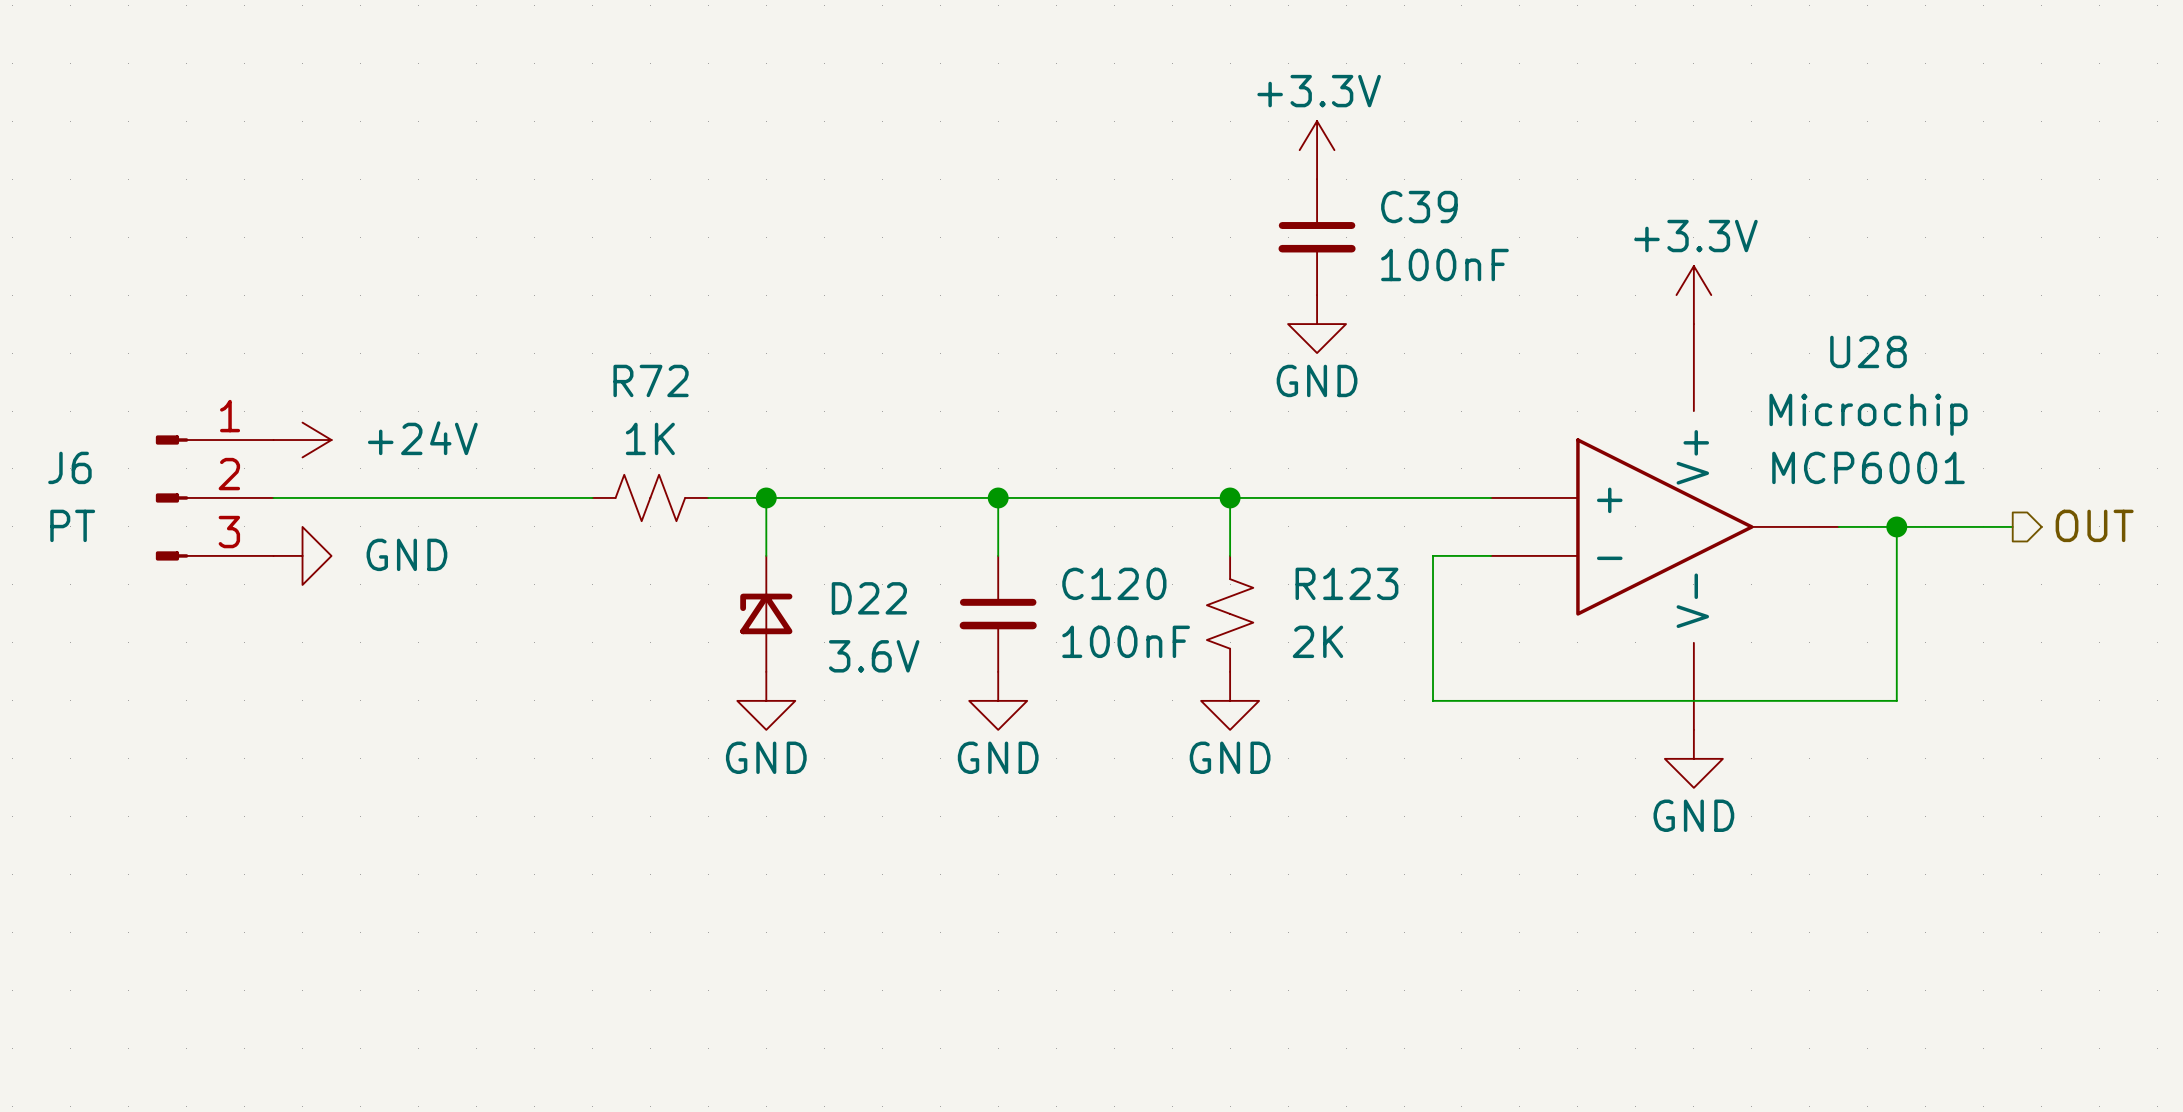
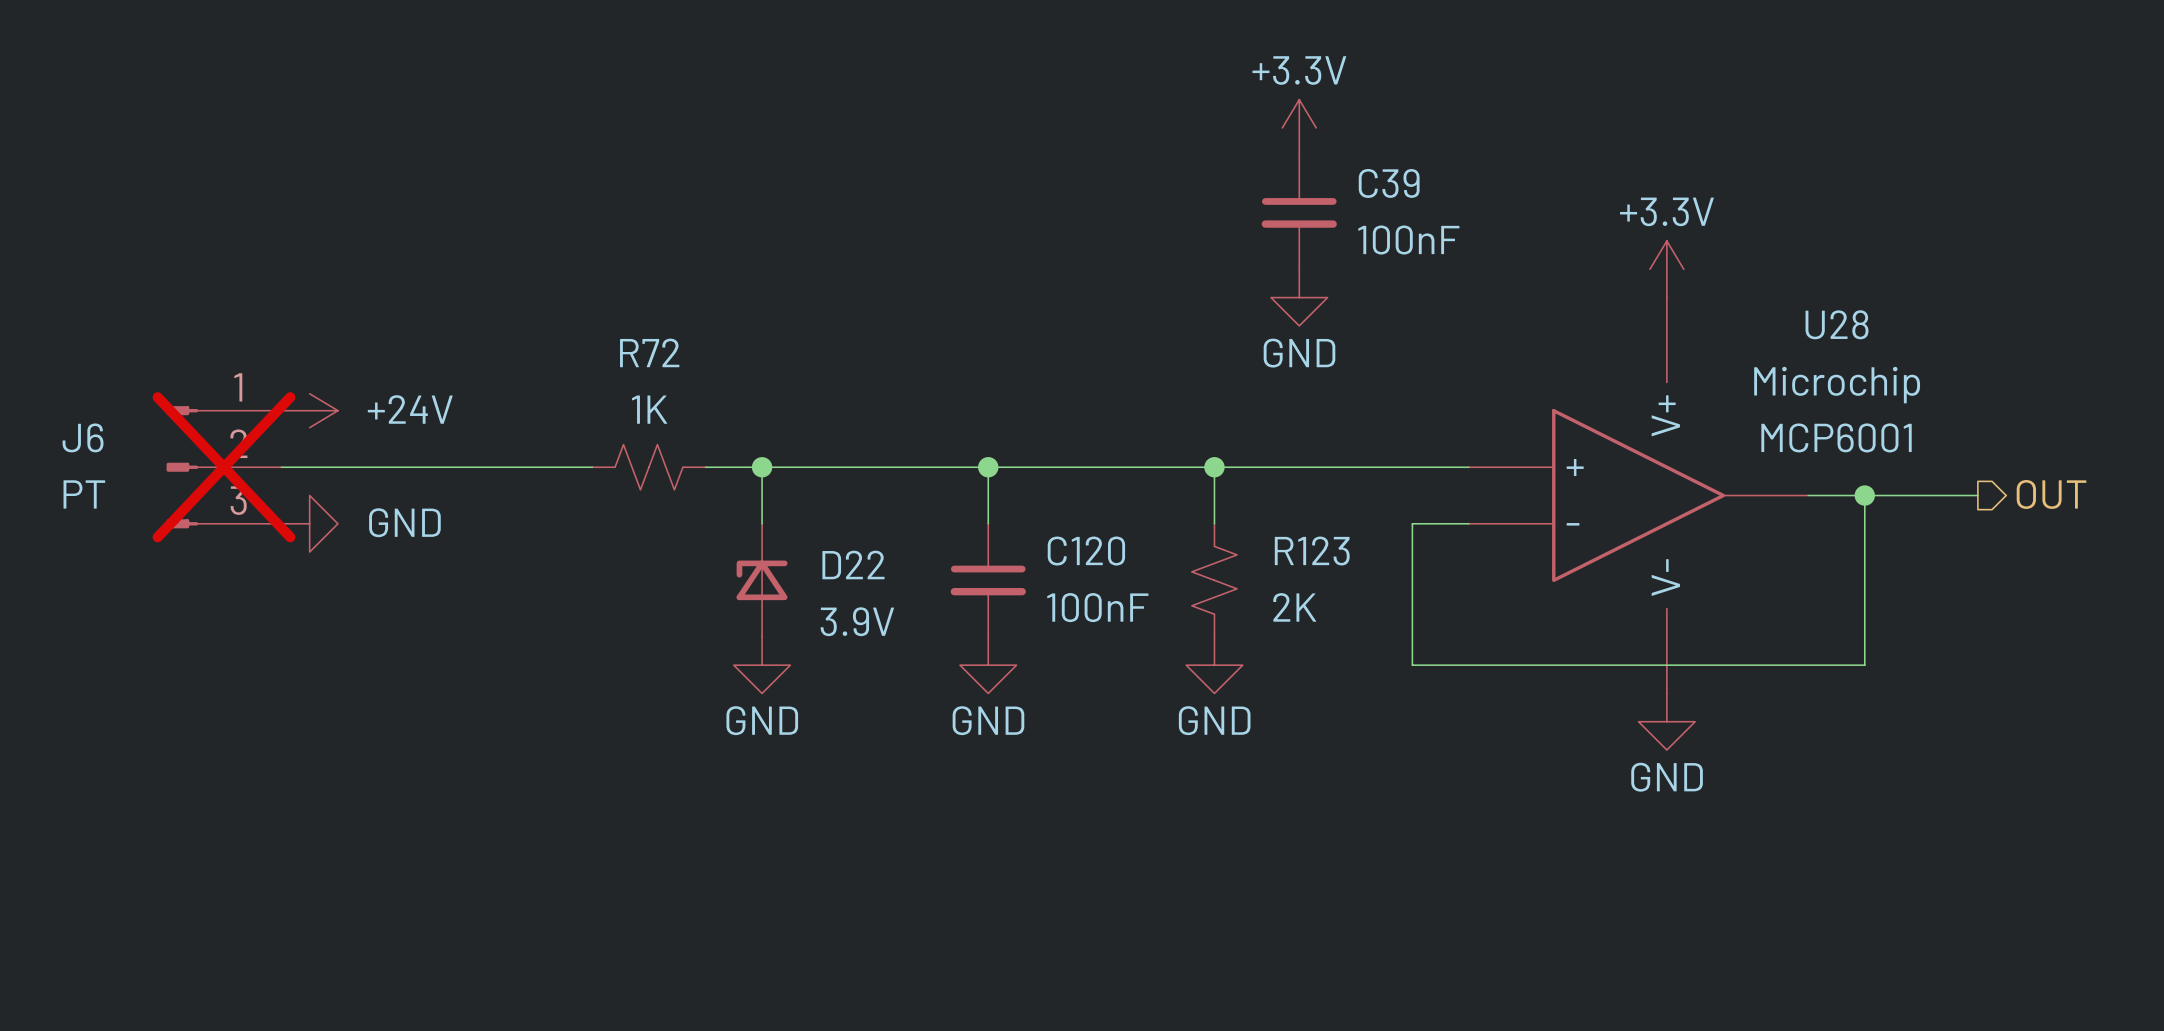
J6 do-not-place cross: none -> (223, 467)
D22 value: 3.6V (874, 656) -> 3.9V (857, 621)

